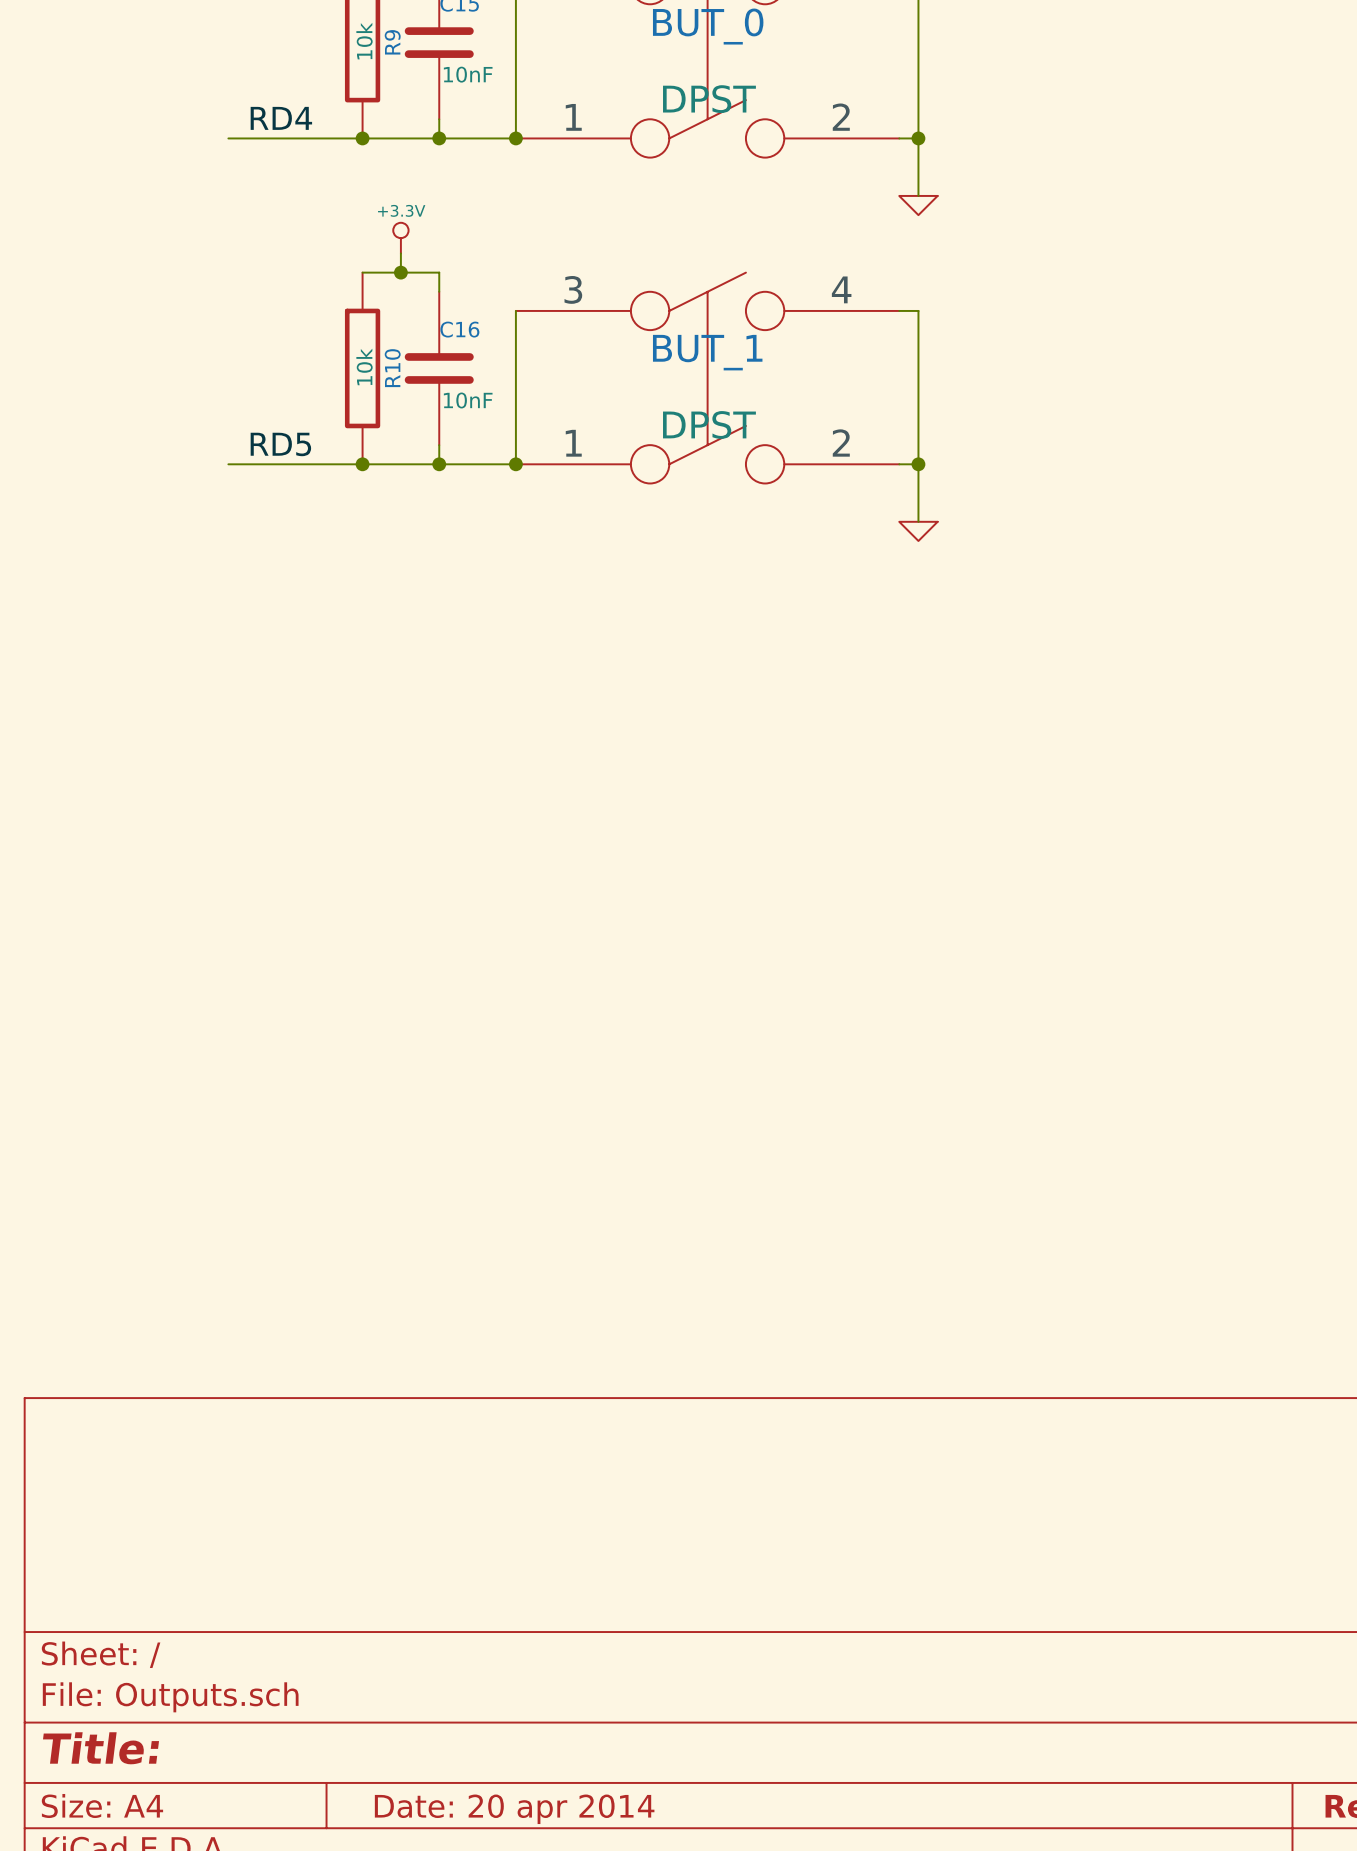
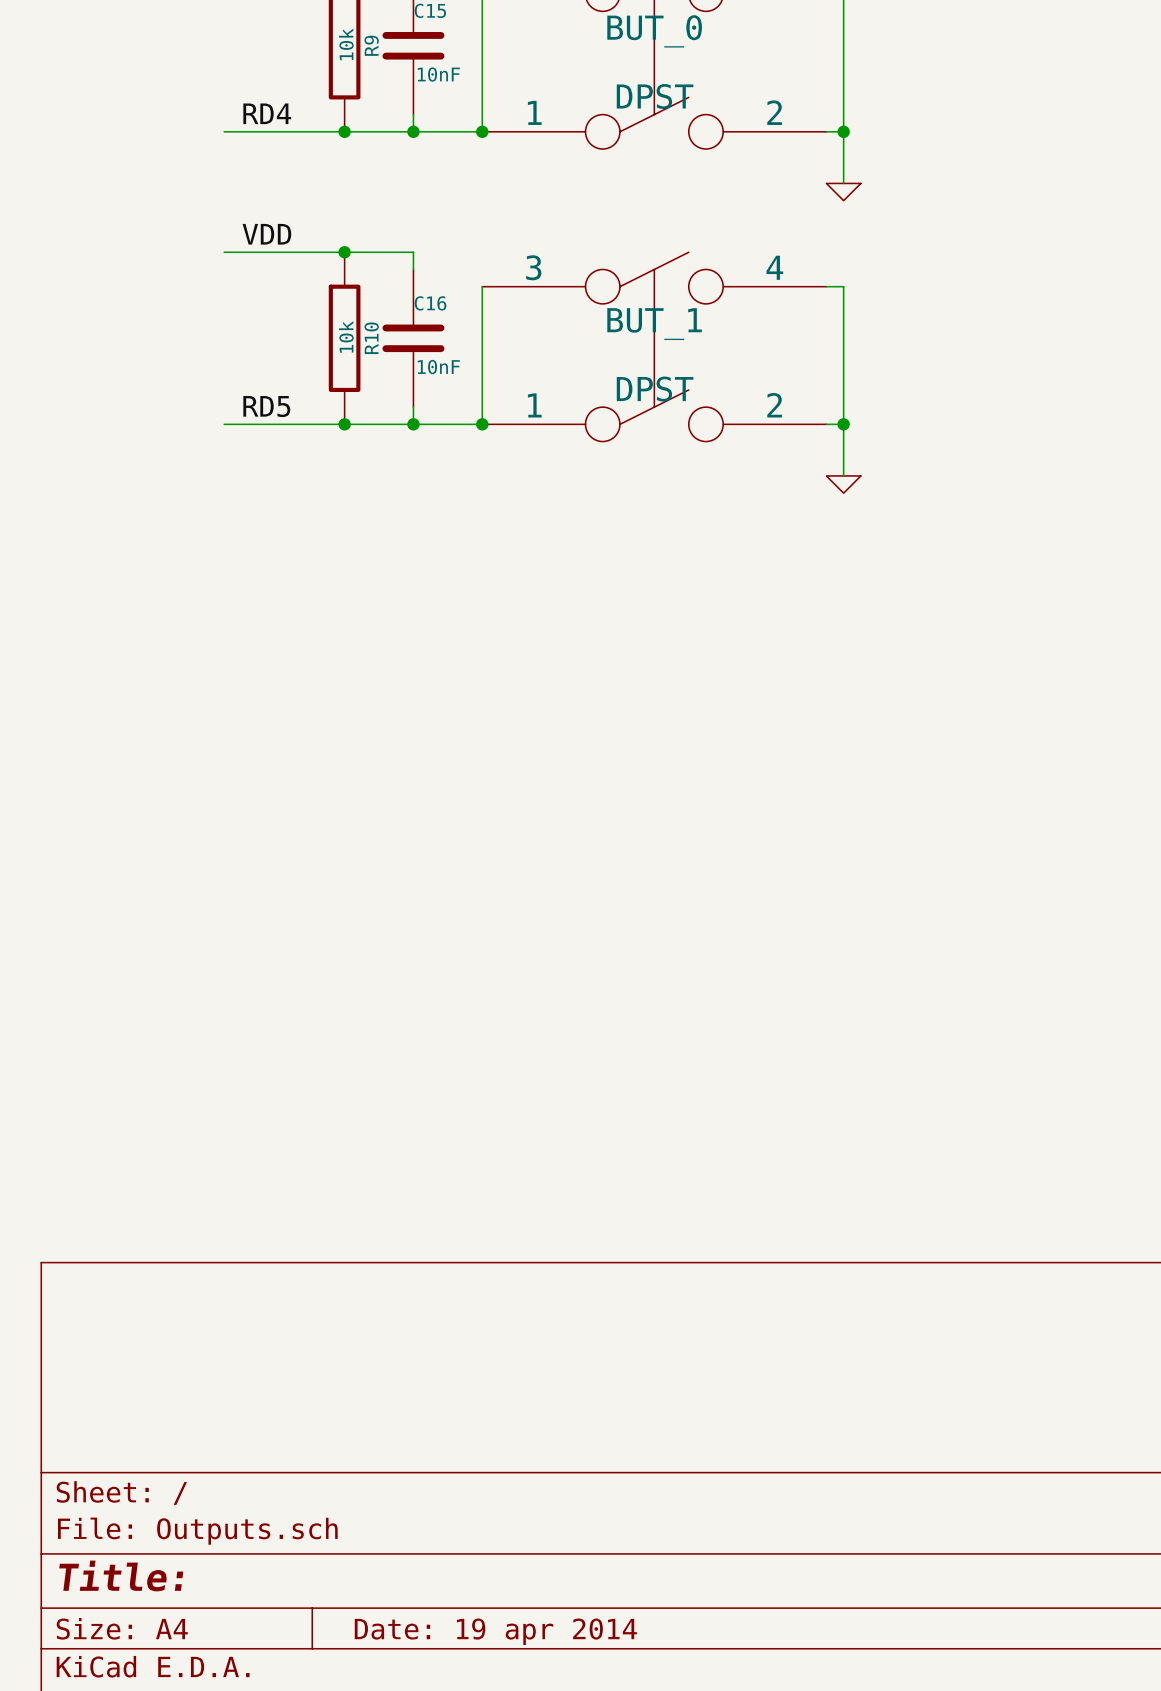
power symbol: +3.3V (400, 238) -> none
label: none -> VDD (266, 234)
wire: (400, 253) (400, 272) -> none
wire: none -> (224, 252) (344, 252)
junction position: (400, 272) -> (344, 252)
title block: Date: 20 apr 2014 (514, 1809) -> Date: 19 apr 2014 (495, 1631)

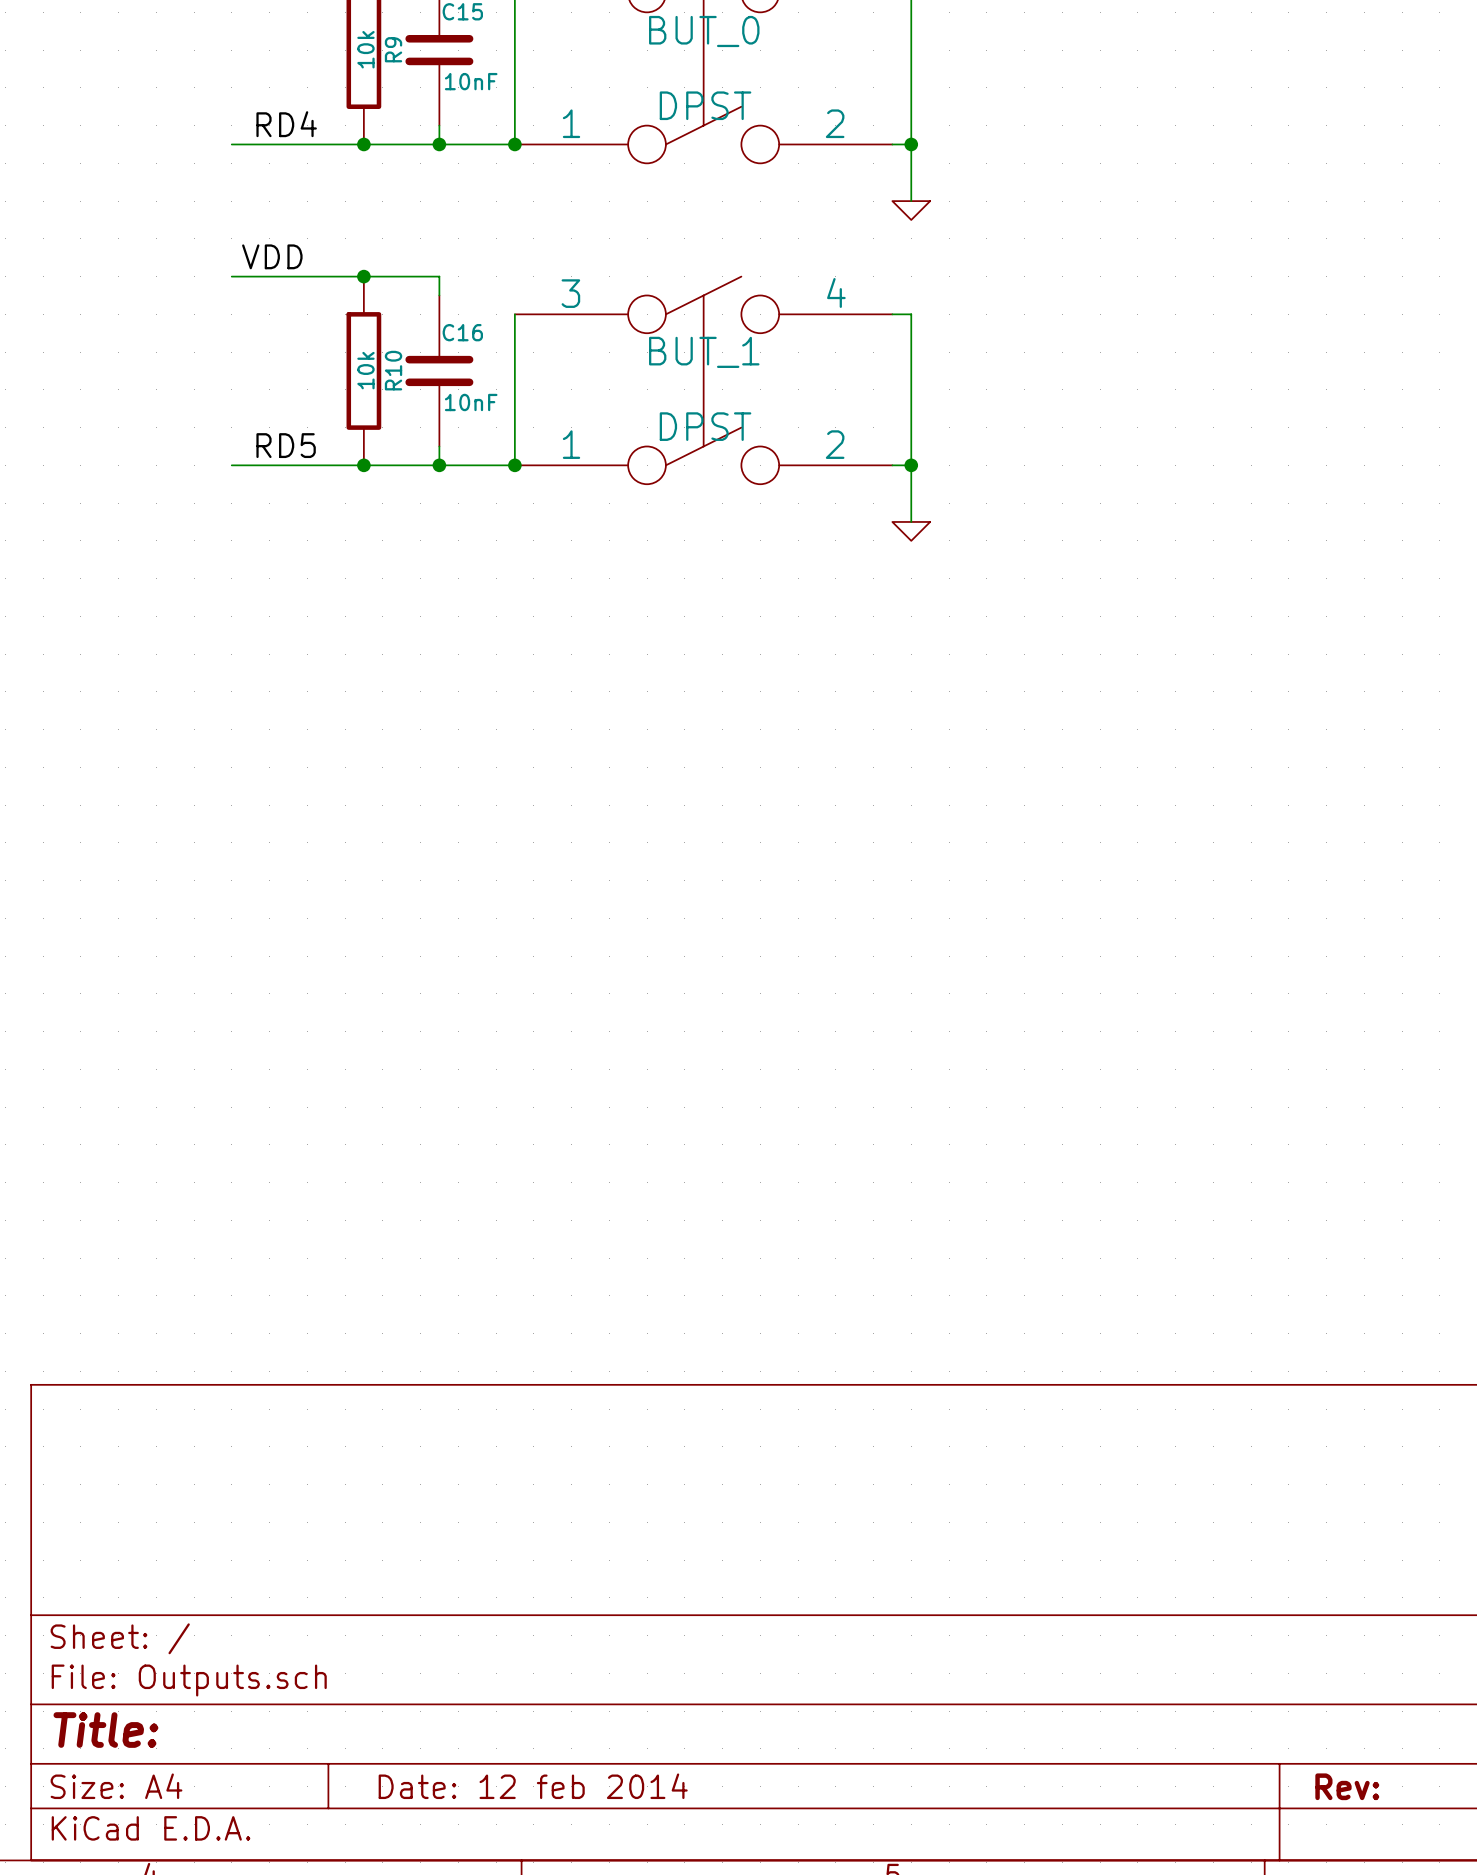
title block: Date: 19 apr 2014 (495, 1631) -> Date: 12 feb 2014 (533, 1786)

